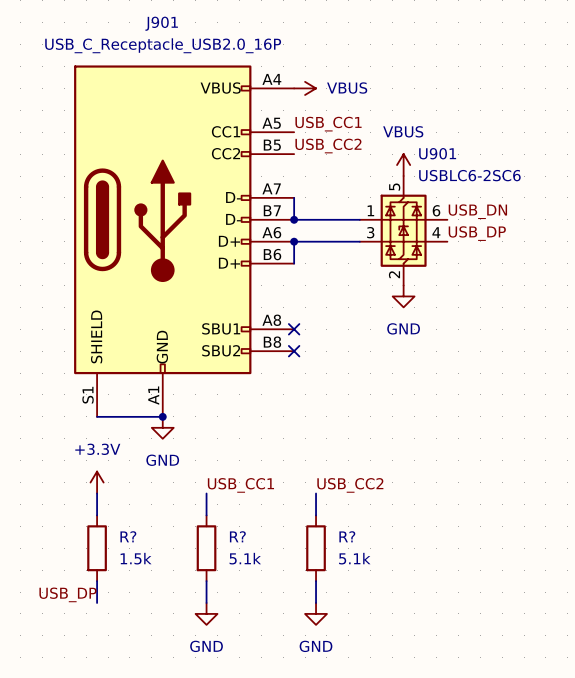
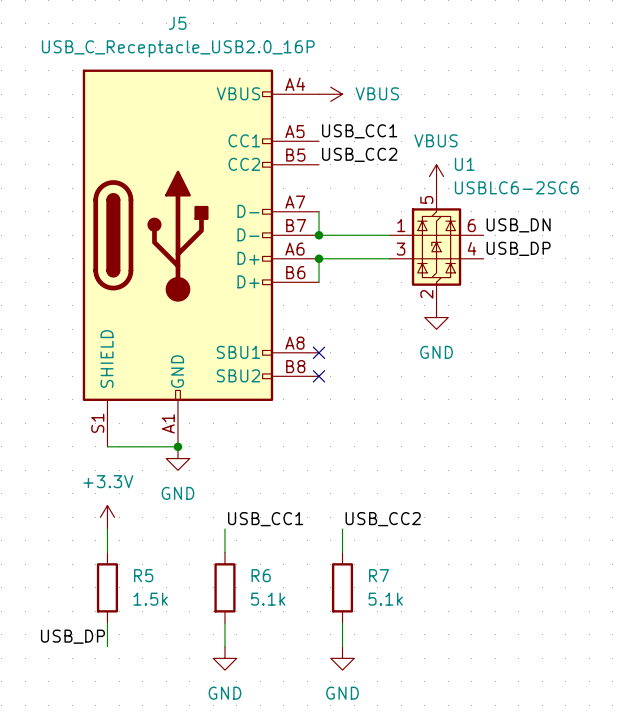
J901 name: J901 (161, 23) -> J5 (177, 23)
U901 name: U901 (437, 153) -> U1 (464, 164)
R? name: R? (128, 536) -> R5 (143, 575)
R? name: R? (237, 536) -> R6 (261, 575)
R? name: R? (347, 536) -> R7 (378, 575)

